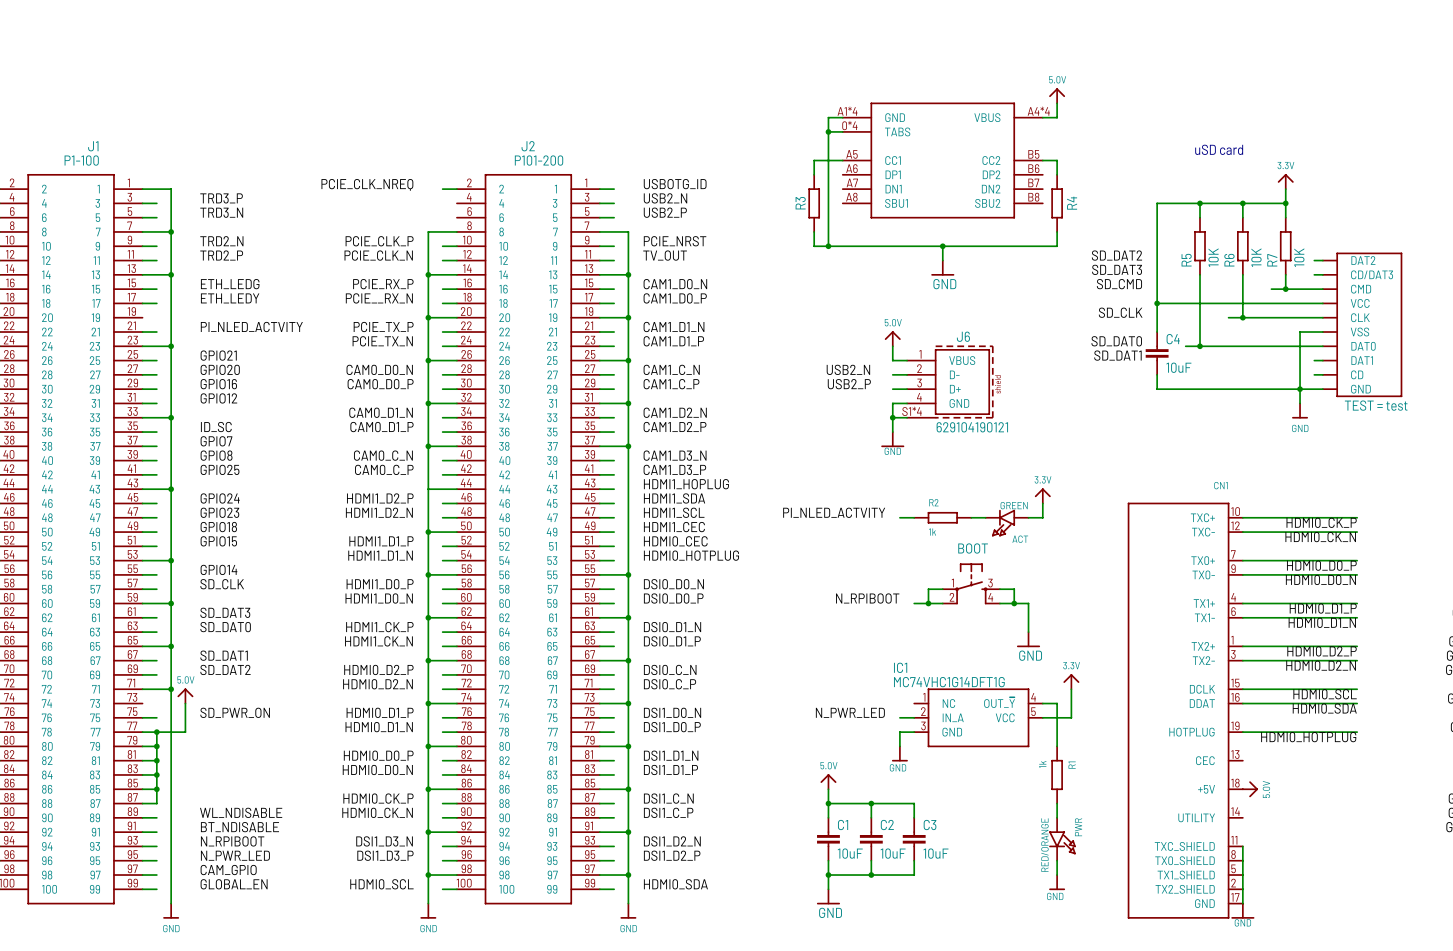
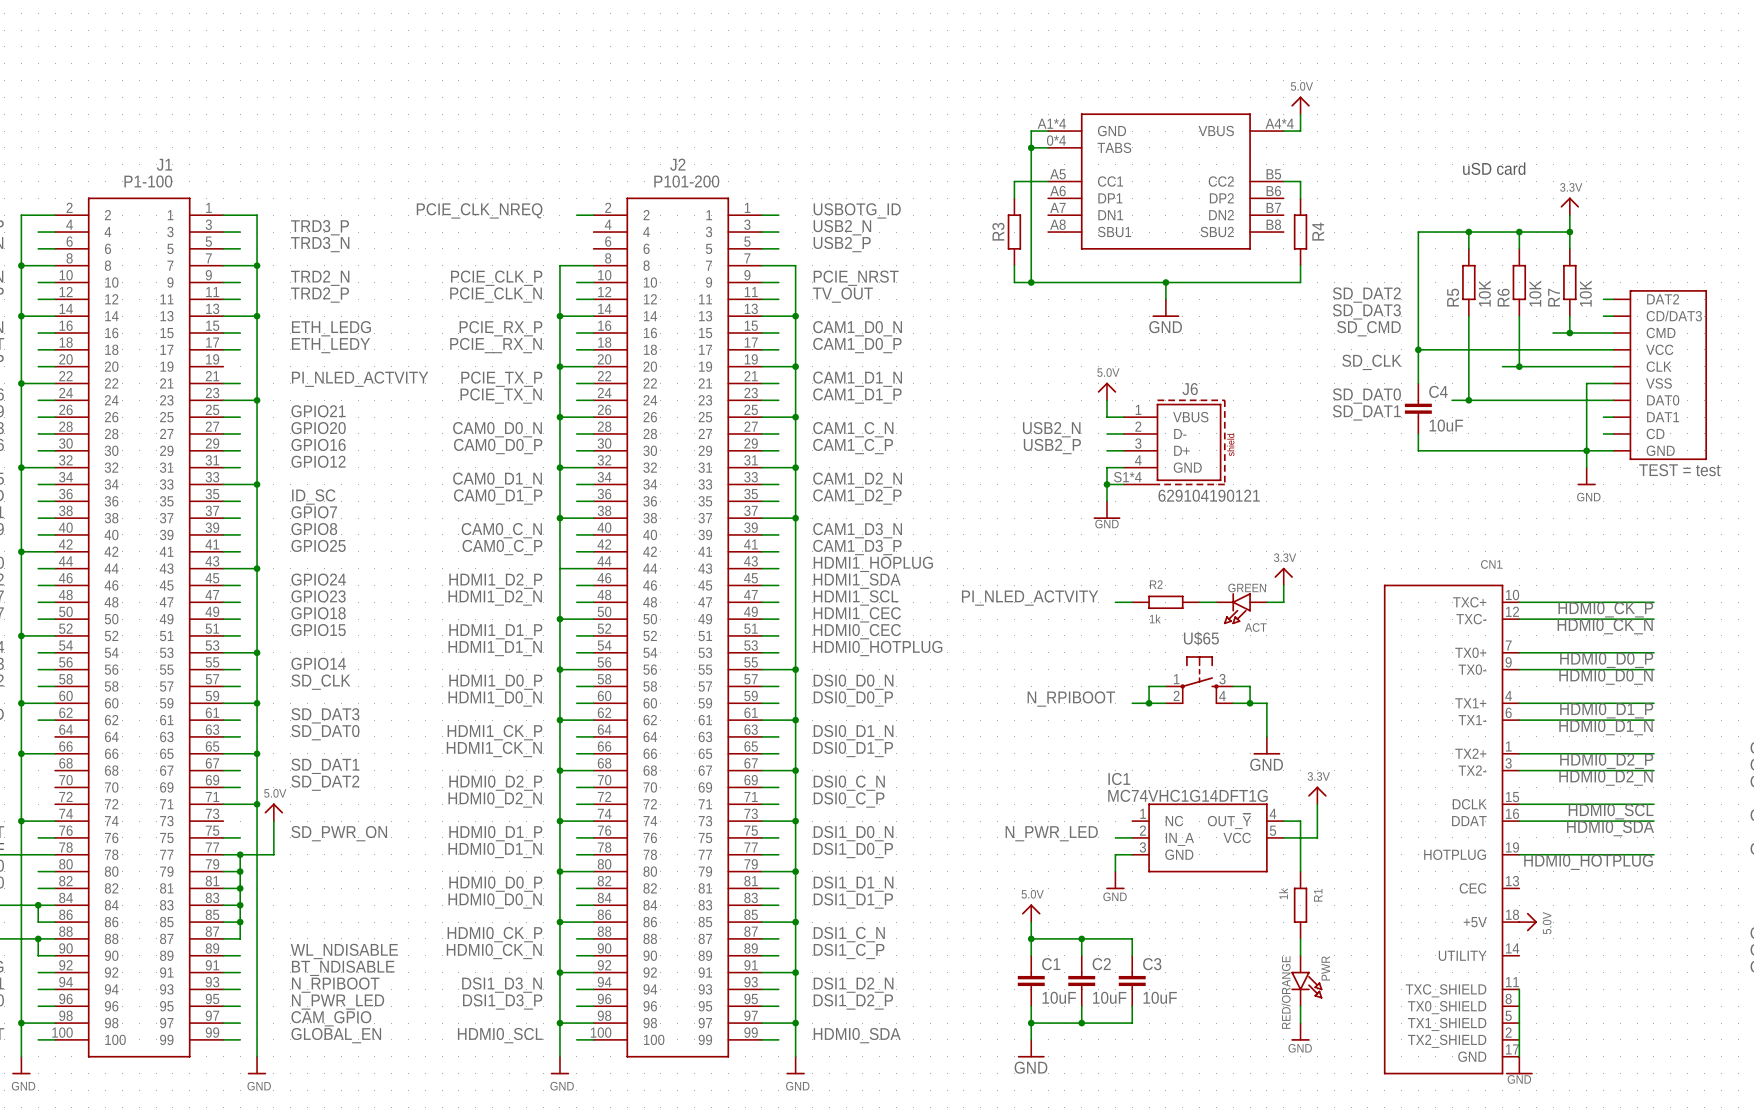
BOOT name: BOOT (973, 548) -> U$65 (1201, 638)

